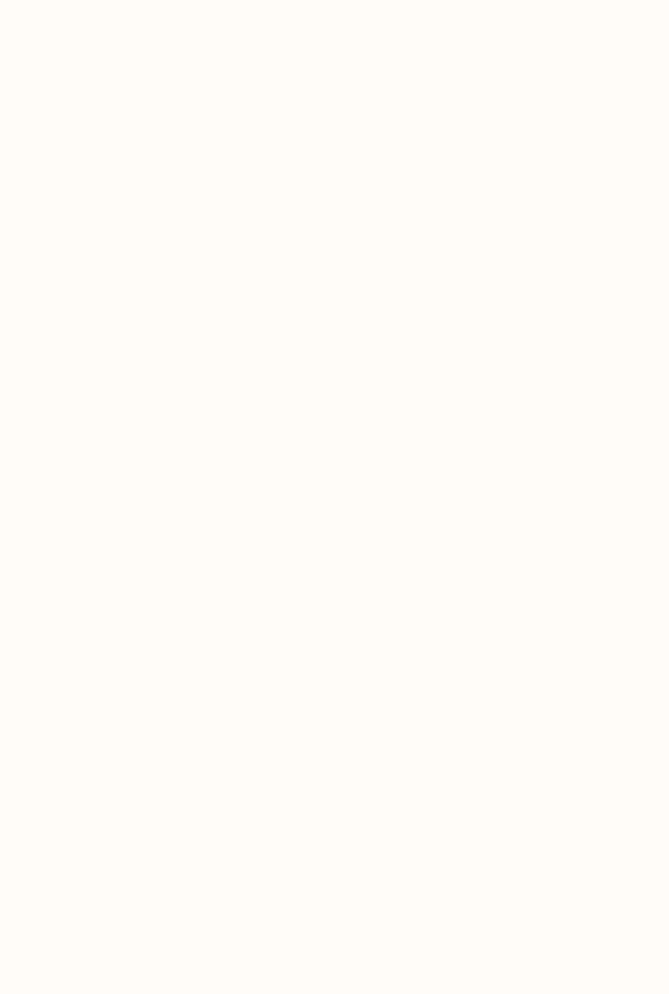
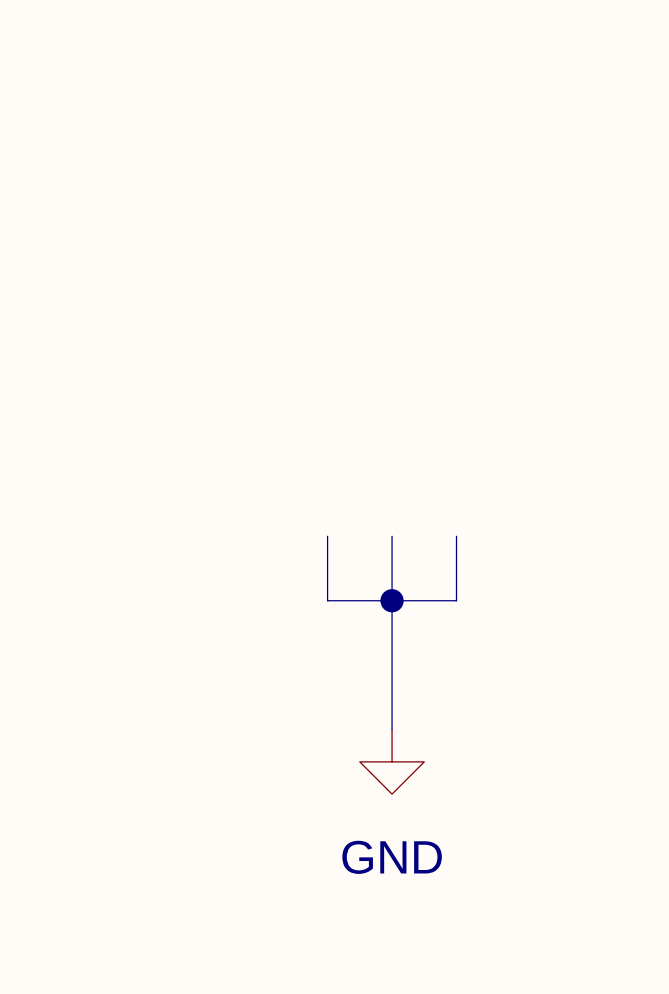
wire: none -> (327, 536) (327, 600) (456, 600) (456, 536)
wire: none -> (392, 536) (392, 729)
junction: none -> (392, 600)
power symbol: none -> GND (392, 761)

